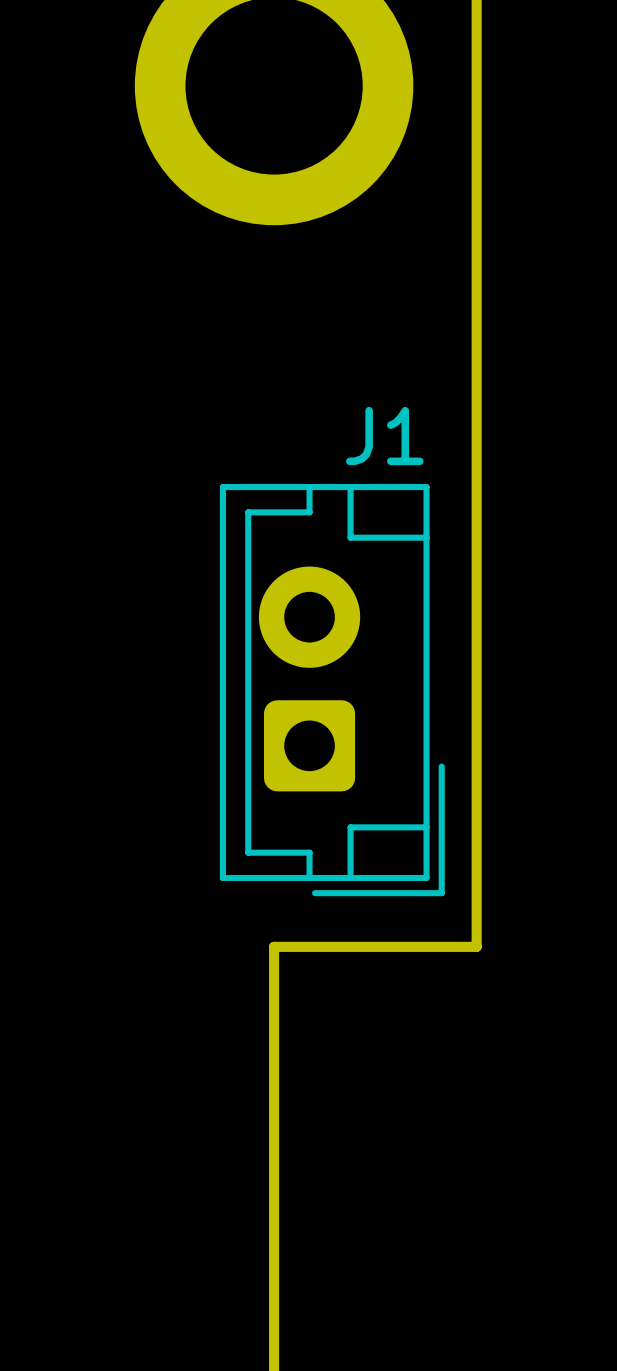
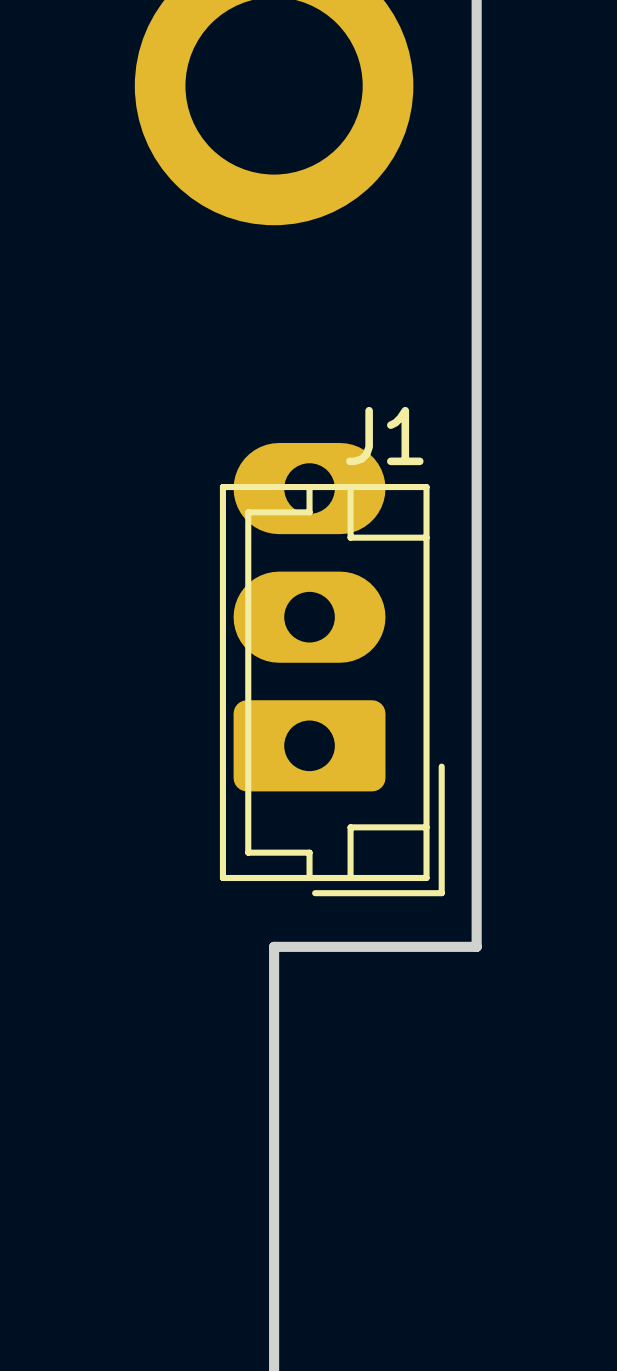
J1 footprint: [219, 484, 445, 897] -> [219, 442, 445, 897]

